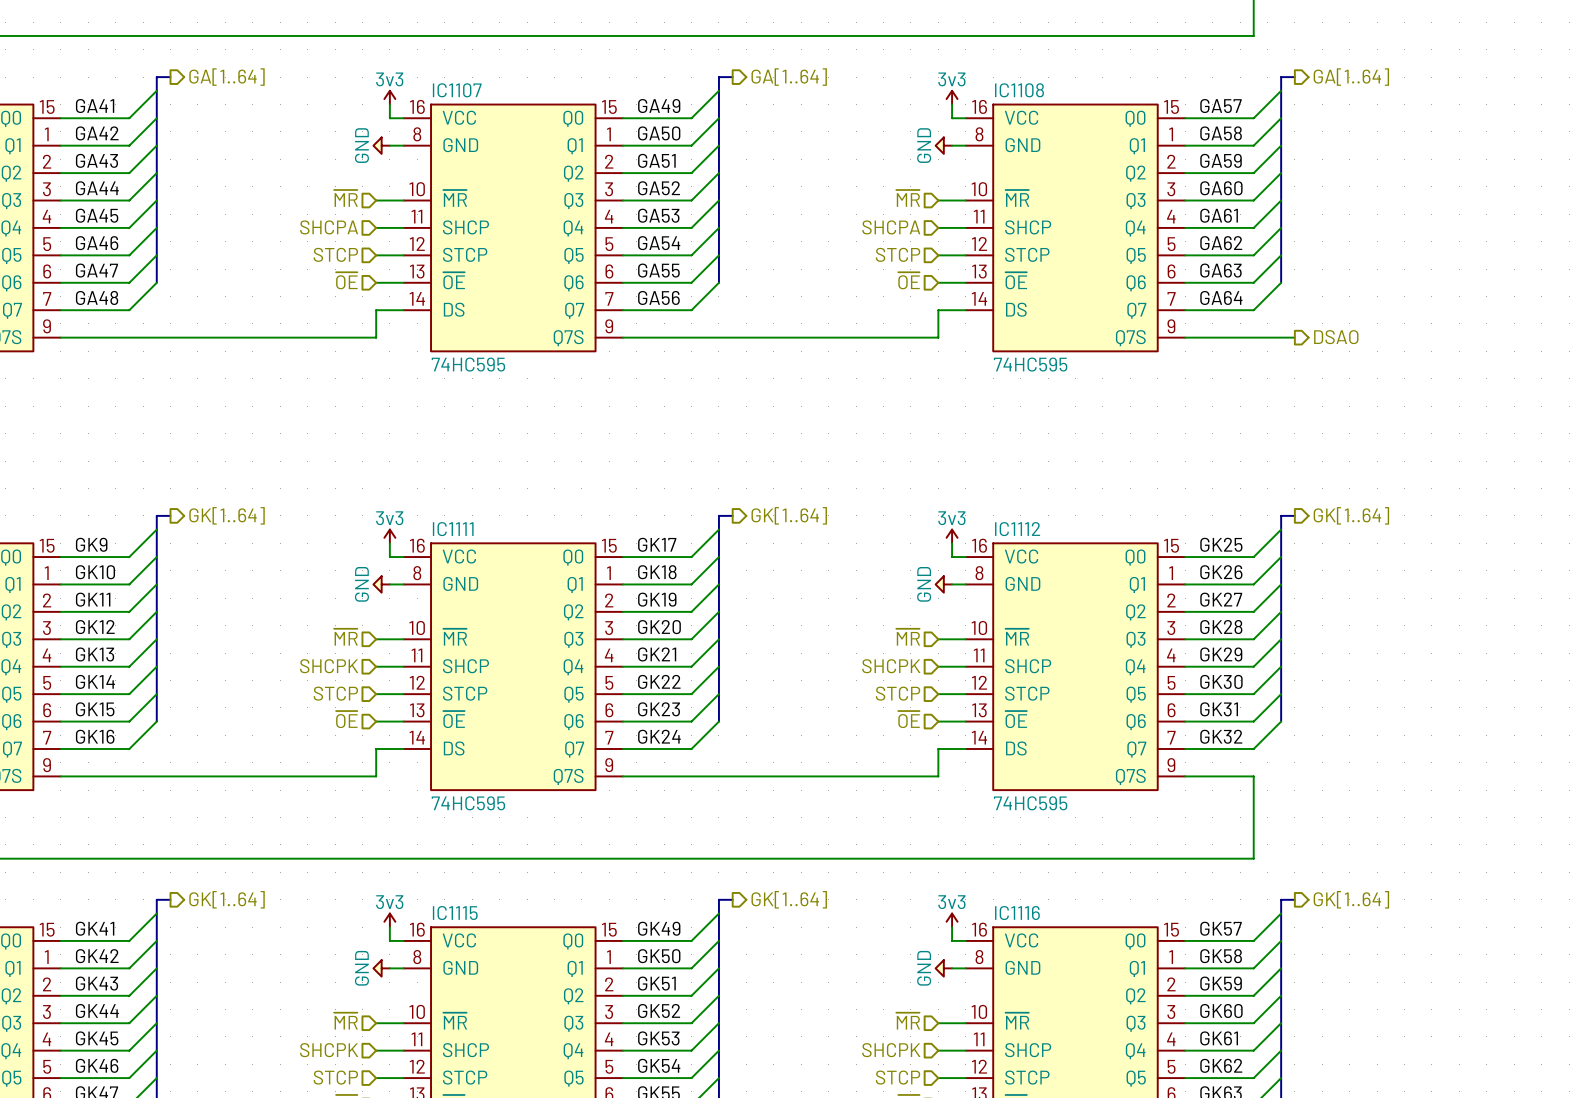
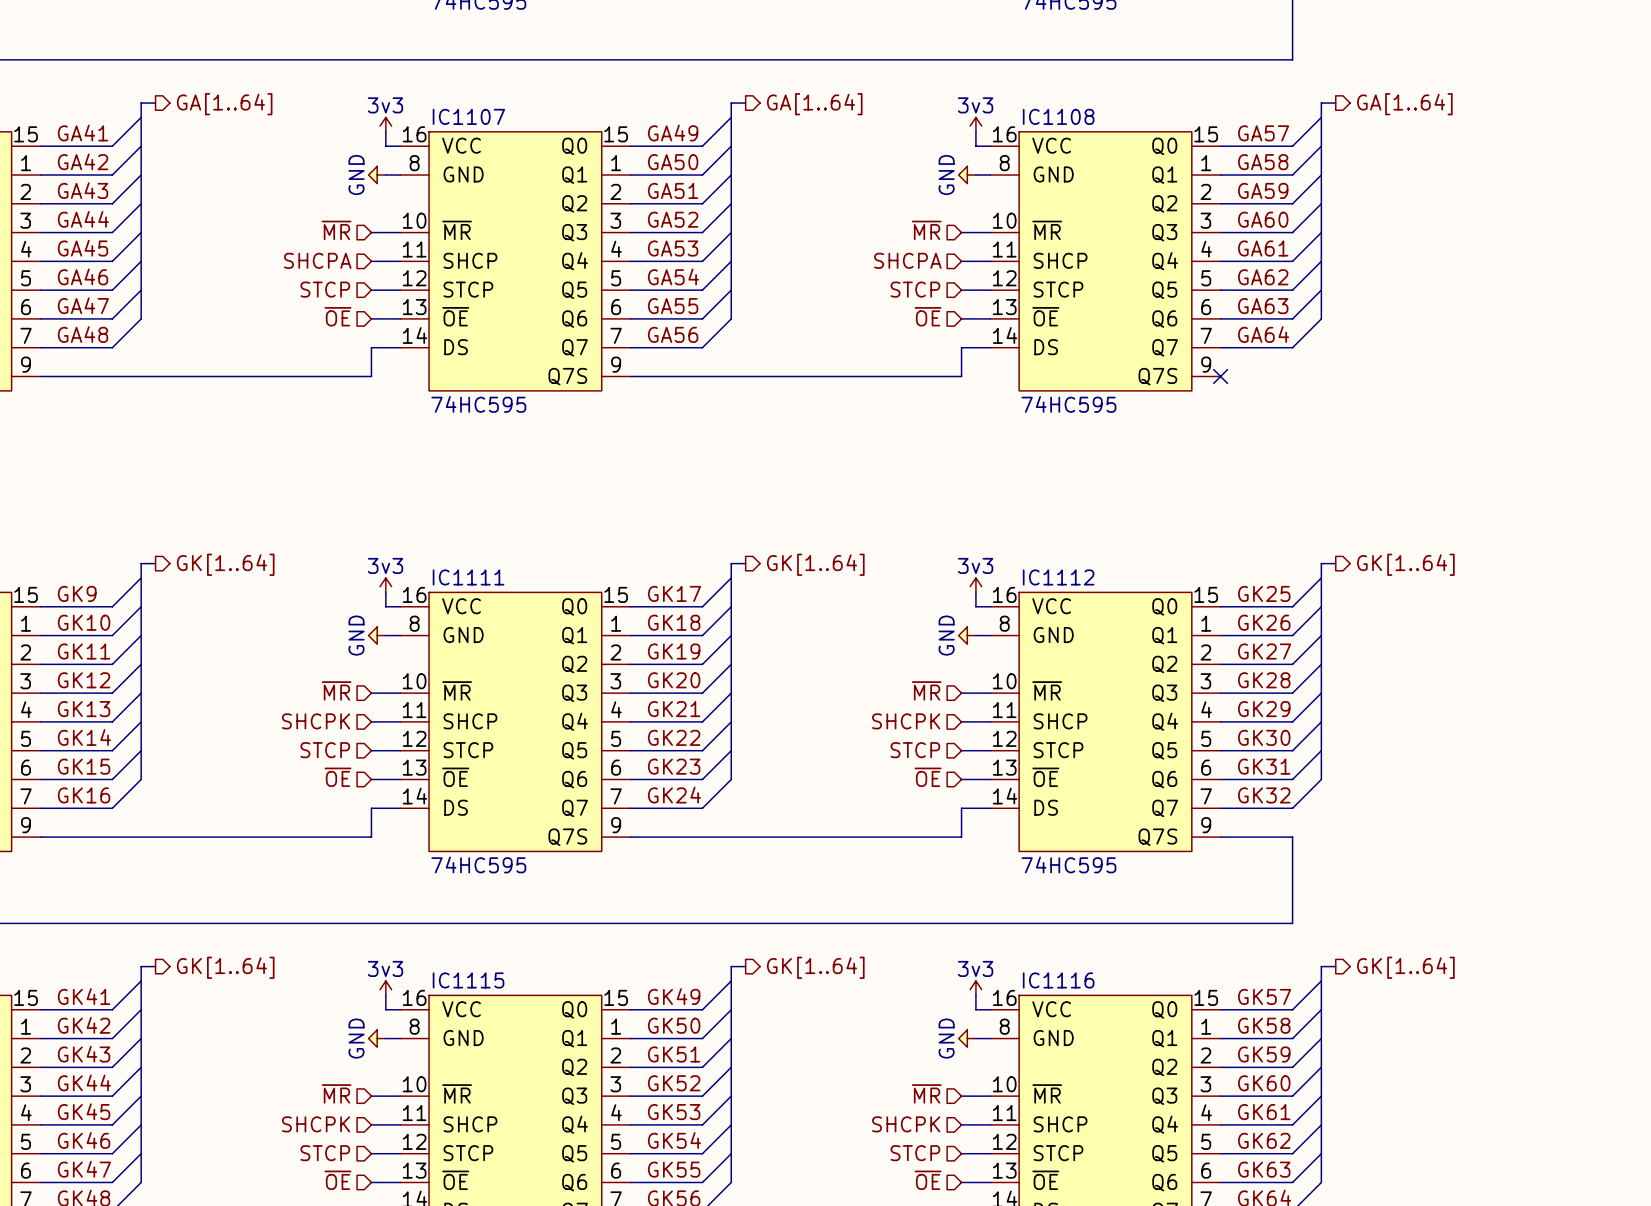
wire: (1185, 337) (1294, 337) -> none
no-connect mark: none -> (1220, 376)
hierarchical label: DSAO (1336, 337) -> none

